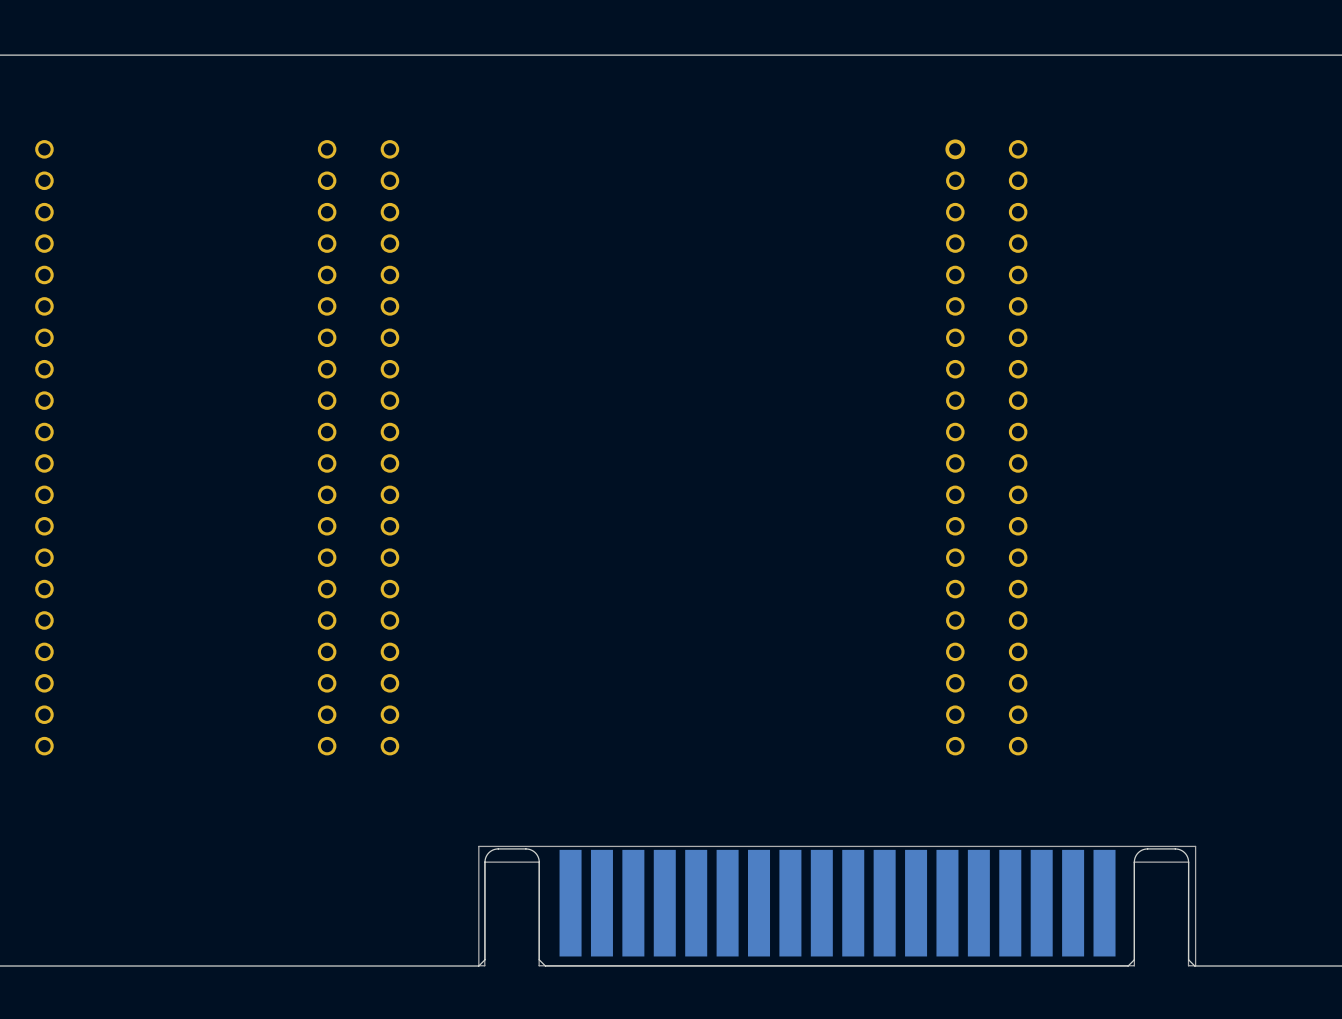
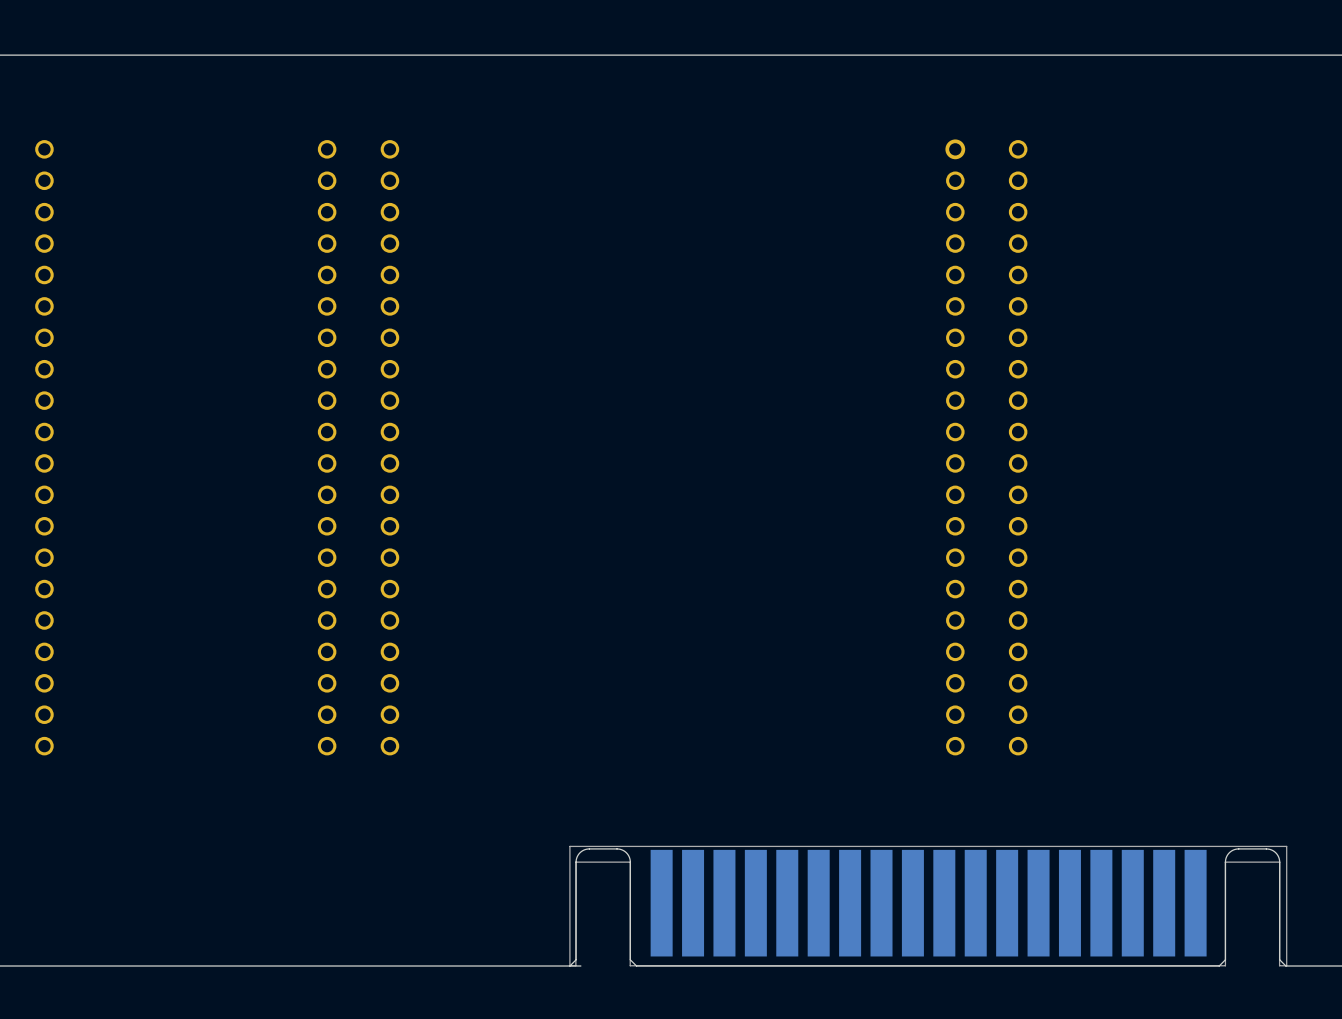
part position: (837, 906) -> (928, 906)
board edge: none -> (580, 966) (478, 966)
board edge: (1285, 966) (1194, 966) -> none

